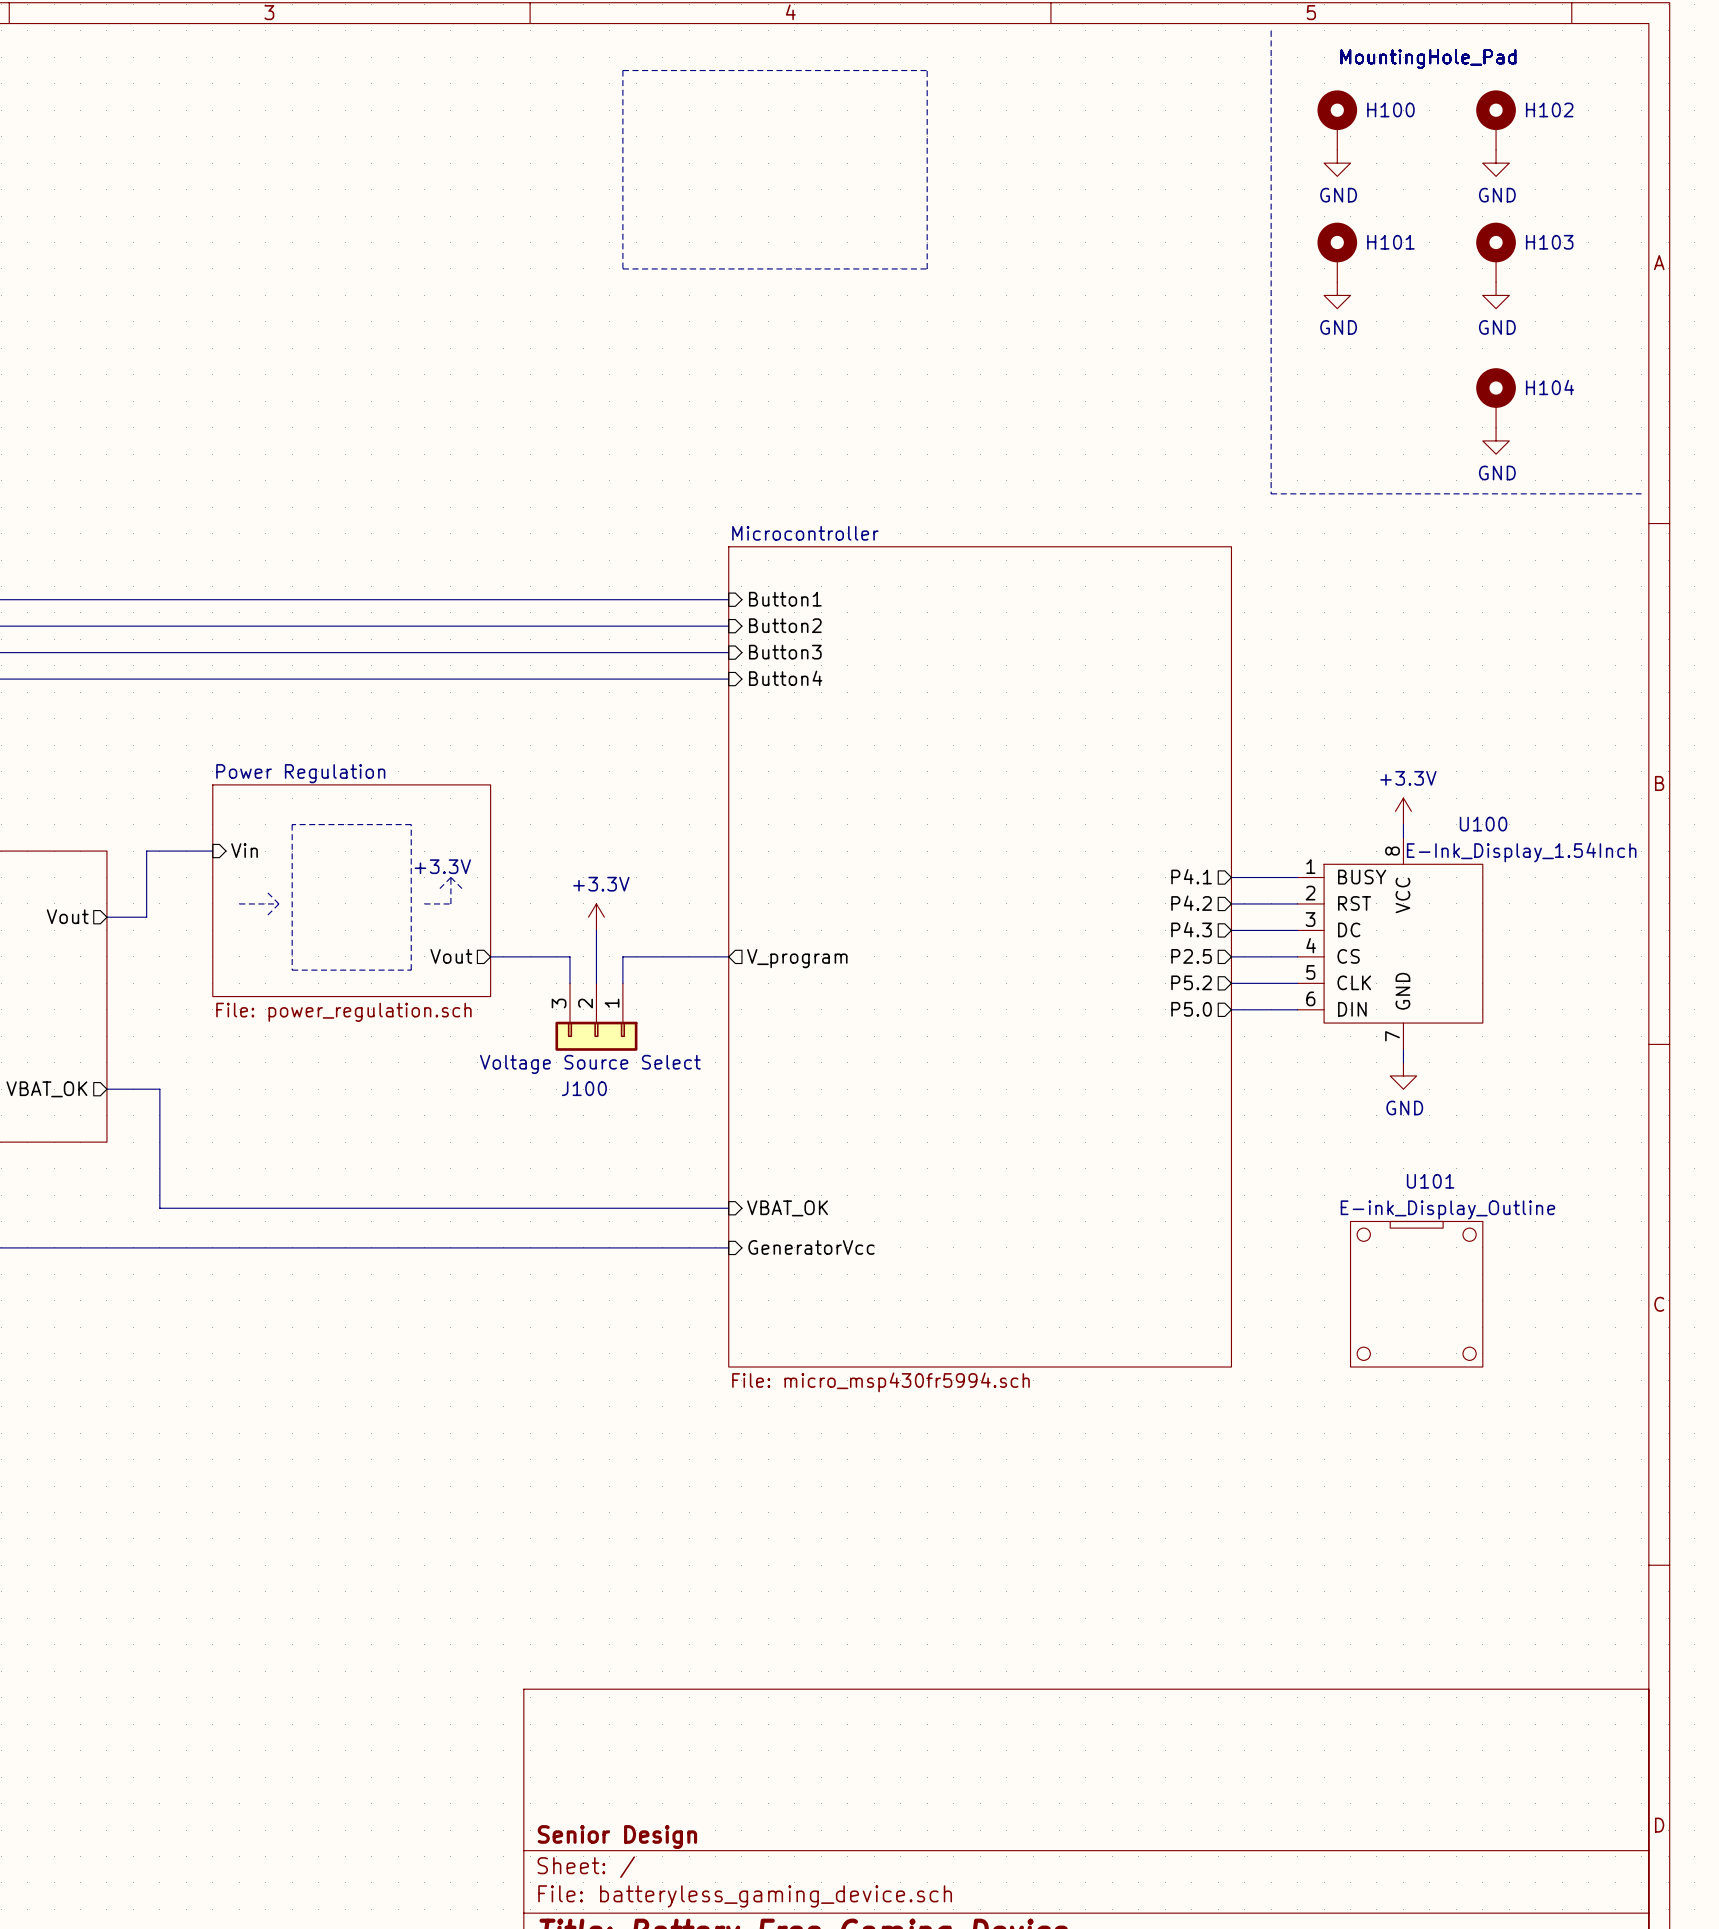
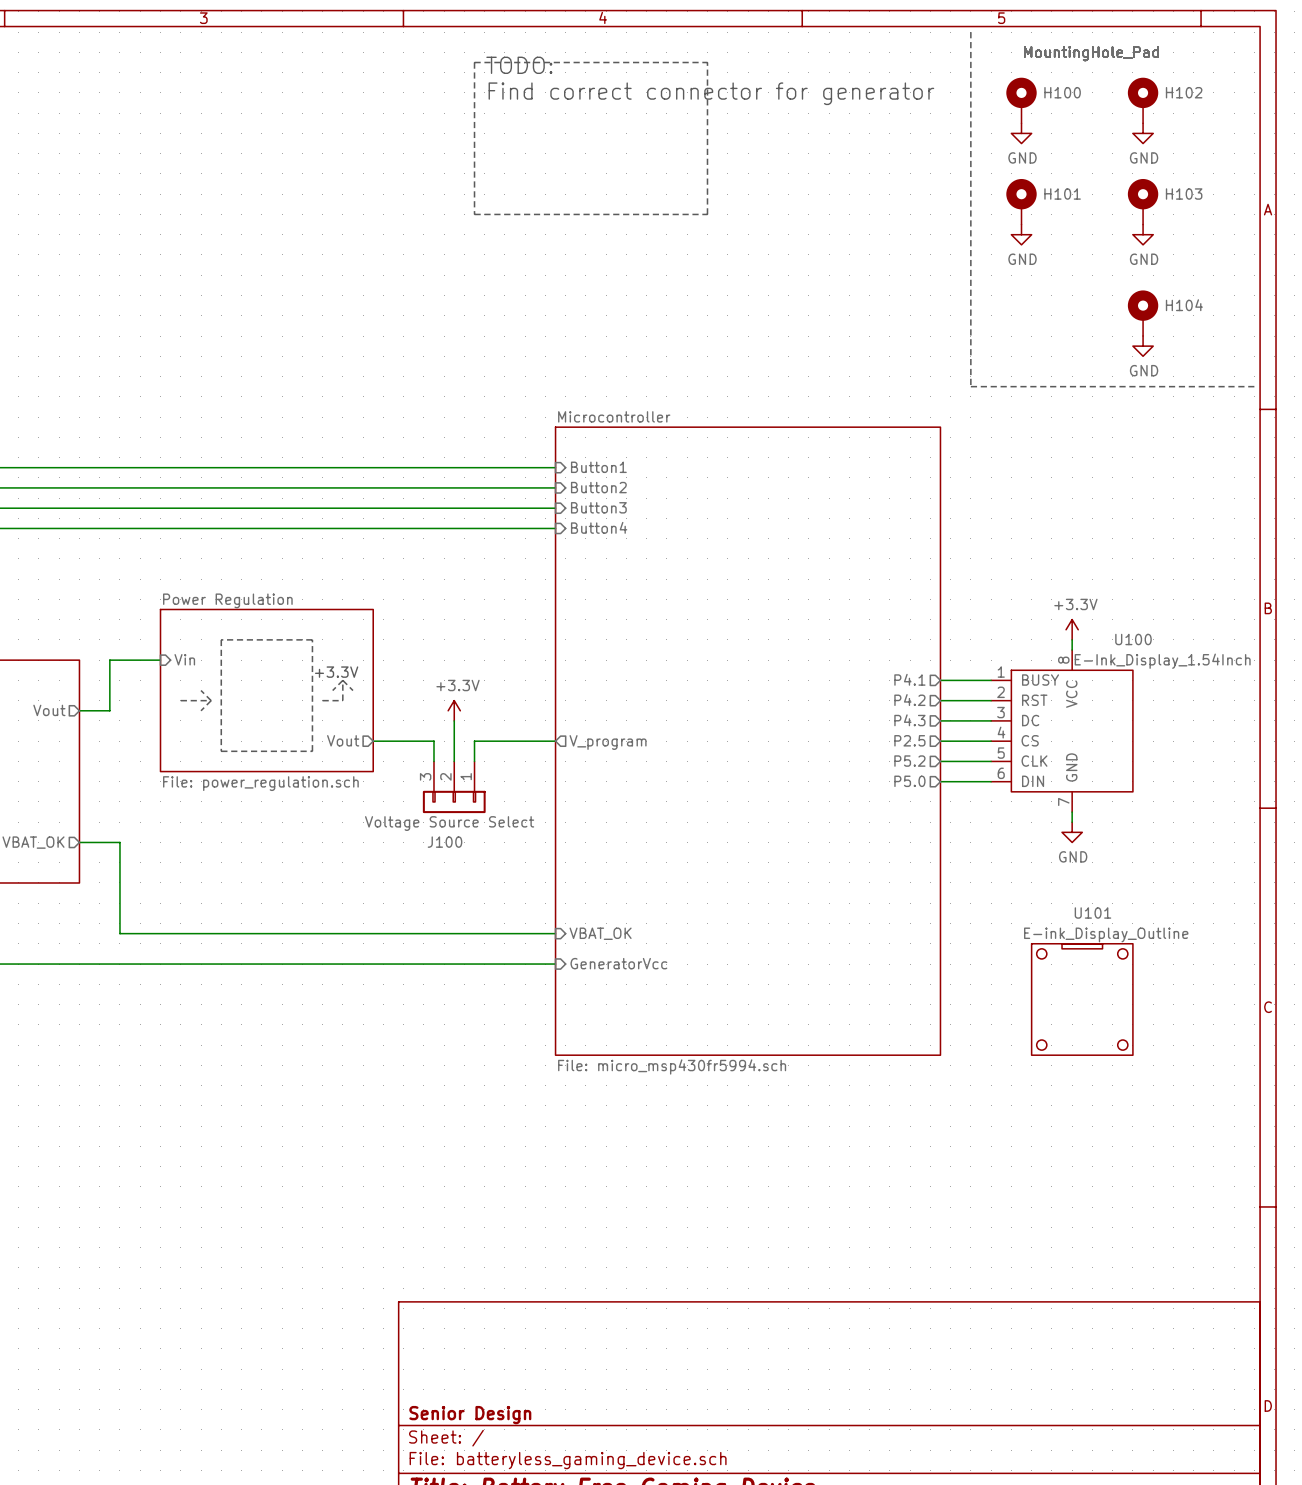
text: none -> TODO: (519, 65)
text: none -> Find correct connector for generator (711, 93)

